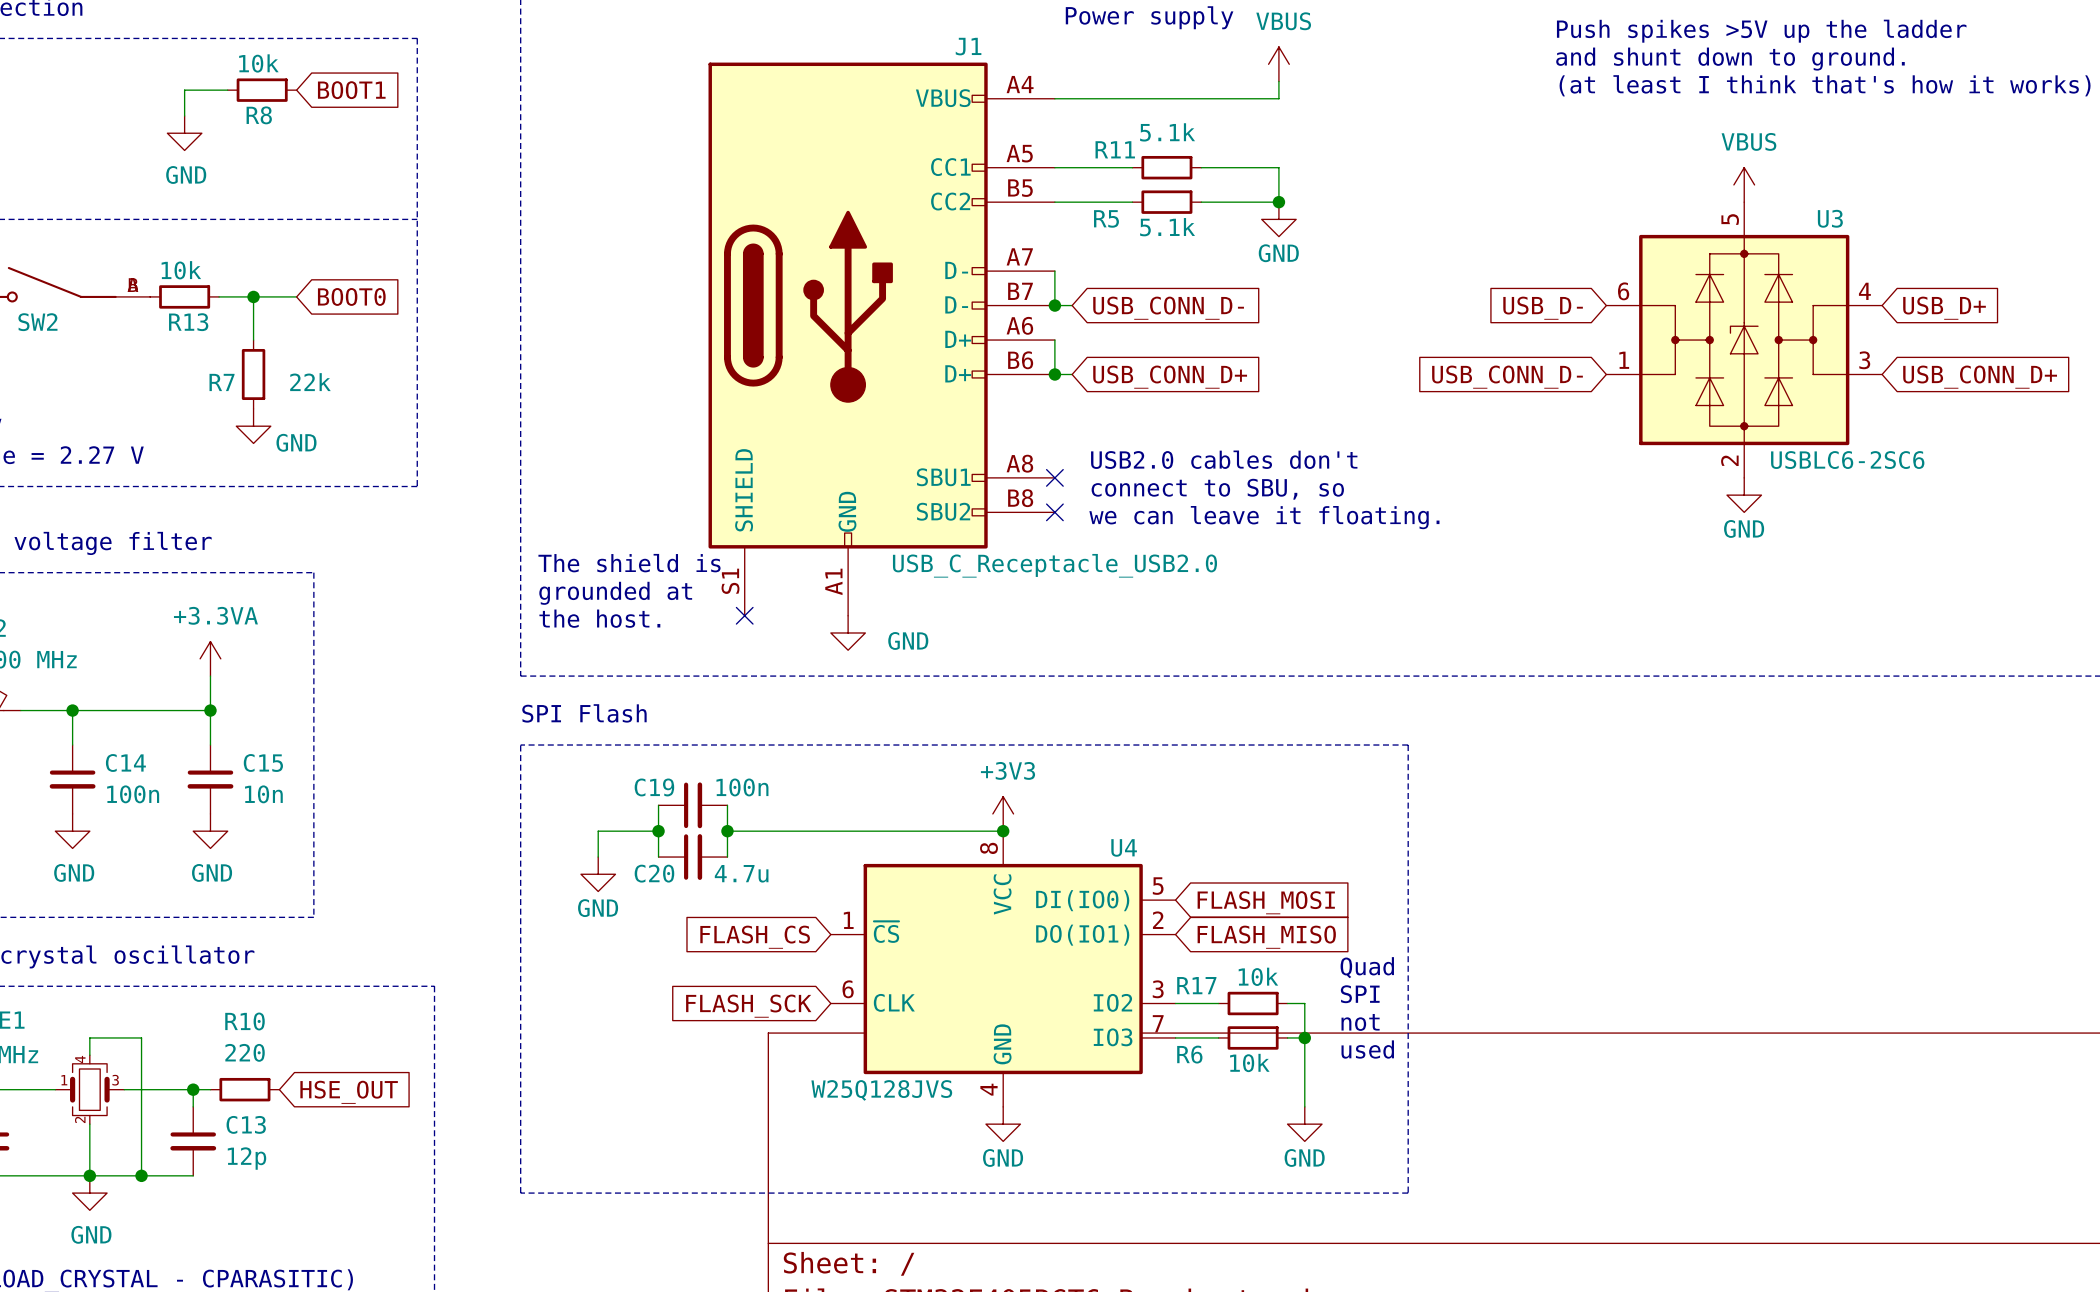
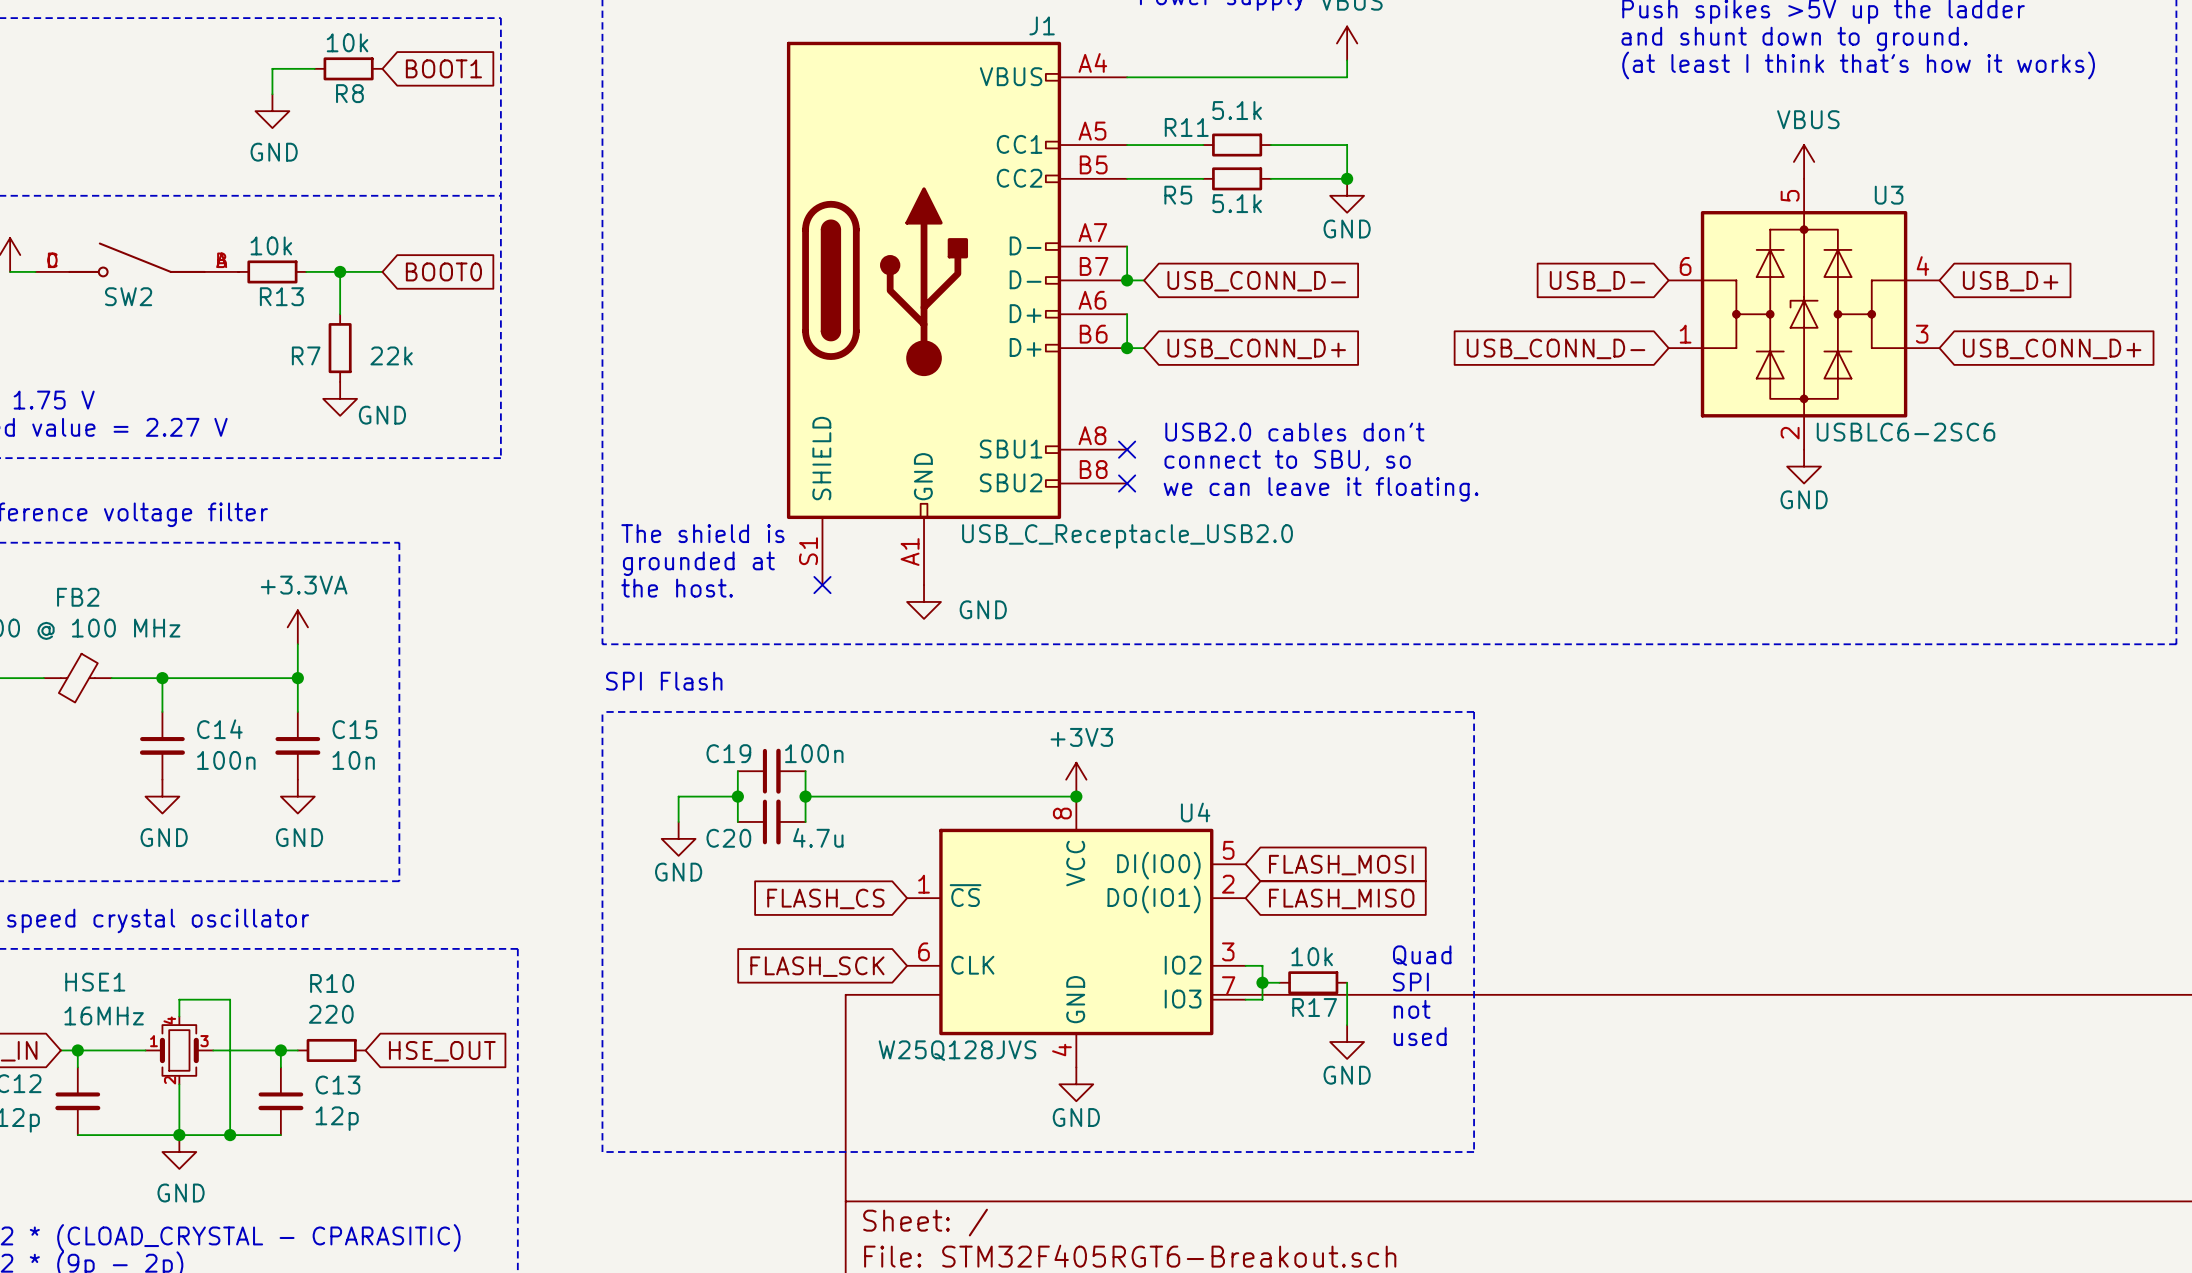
text position: Quad (1367, 967) -> Quad (1422, 955)
R17 value position: 10k (1258, 976) -> 10k (1312, 956)
R17 name position: R17 (1196, 985) -> R17 (1314, 1007)
text position: SPI (1360, 994) -> SPI (1410, 982)
wire: (1192, 1003) (1218, 1003) -> (1262, 965) (1262, 999)
R17 position: (1253, 1003) -> (1313, 982)
wire: (1287, 1003) (1304, 1003) (1304, 1106) -> none
junction: none -> (1262, 982)
wire: none -> (1347, 982) (1347, 1025)
text position: not (1360, 1022) -> not (1412, 1009)
wire: (1192, 1037) (1218, 1037) -> none
R6: 10k (1253, 1037) -> none
wire: (1287, 1037) (1304, 1037) -> (1262, 982) (1279, 982)
junction: (1304, 1037) -> none
text position: used (1367, 1049) -> used (1420, 1036)
power symbol position: GND (1304, 1124) -> GND (1347, 1042)

